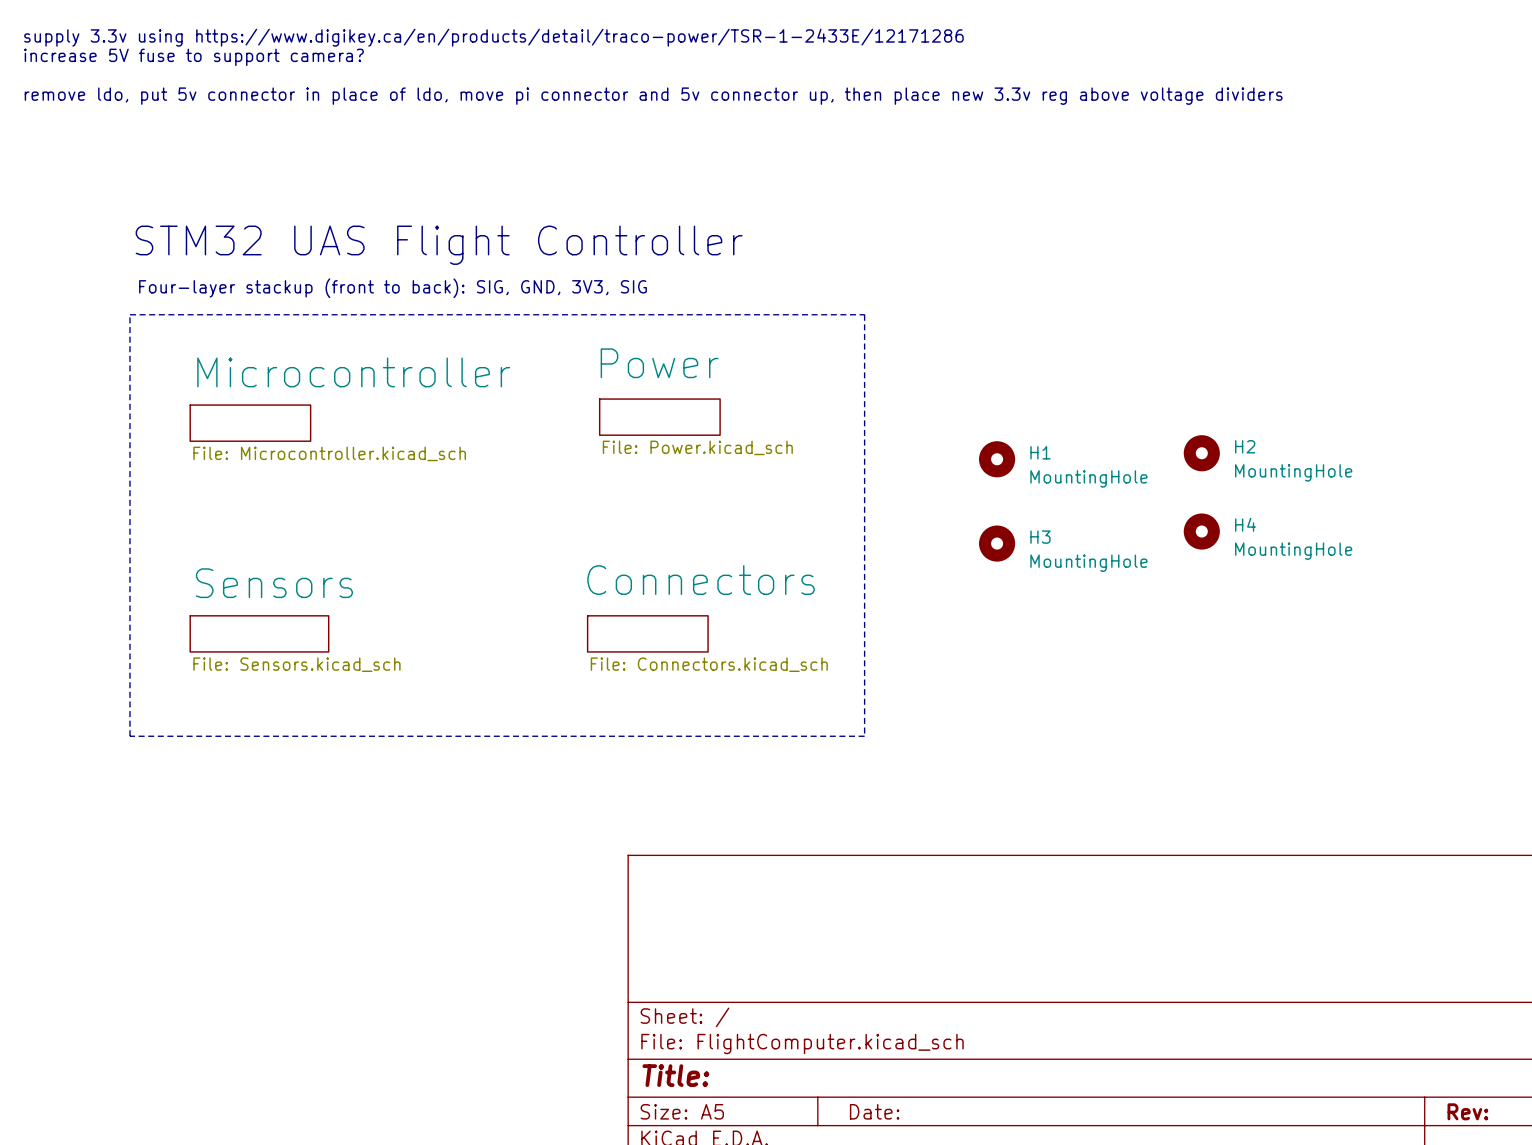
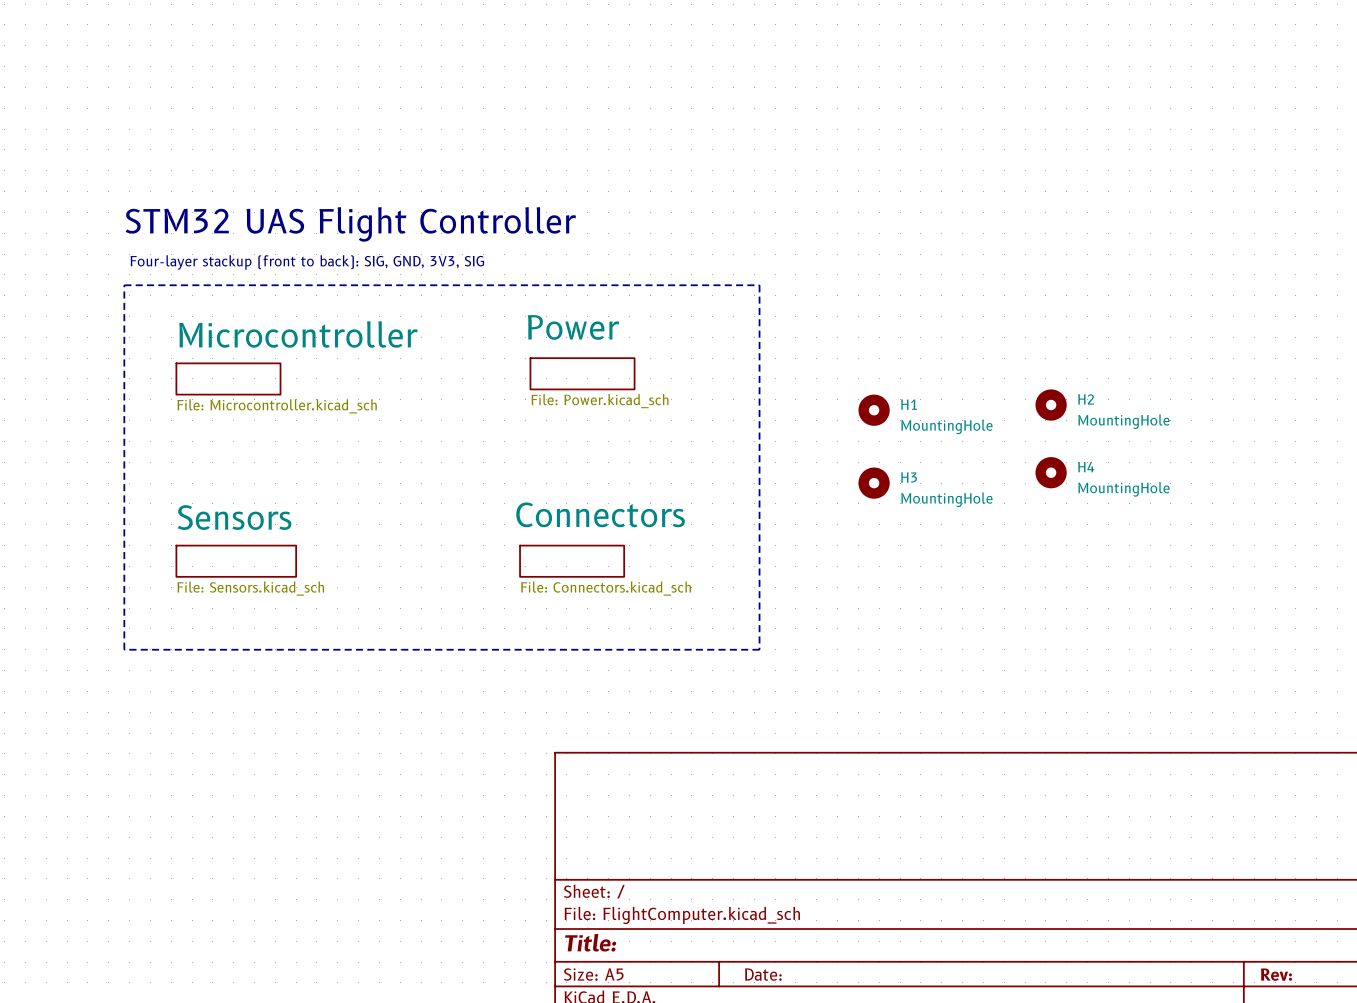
text: supply 3.3v using https://www.digikey.ca/en/products/detail/traco-power/TSR-1-2433E/12171286 (493, 37) -> none
text: increase 5V fuse to support camera? (194, 57) -> none
text: remove ldo, put 5v connector in place of ldo, move pi connector and 5v connector up, then place new 3.3v reg above voltage dividers (653, 96) -> none

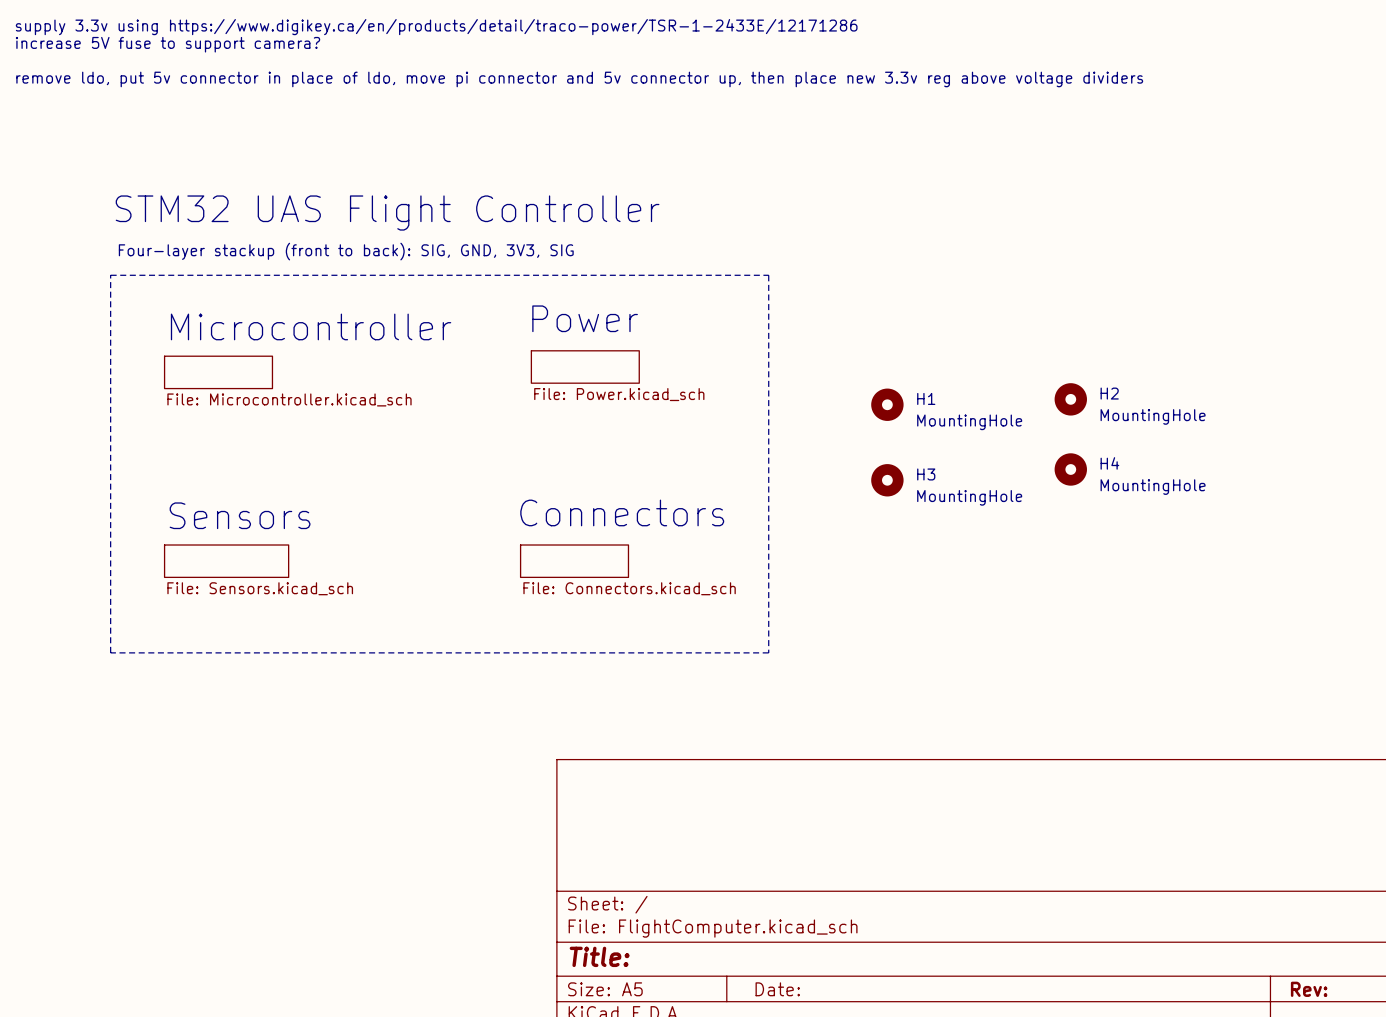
text: none -> supply 3.3v using https://www.digikey.ca/en/products/detail/traco-power/TSR-1-2433E/12171286 (436, 27)
text: none -> increase 5V fuse to support camera? (167, 44)
text: none -> remove ldo, put 5v connector in place of ldo, move pi connector and 5v connector up, then place new 3.3v reg above voltage dividers (579, 79)

